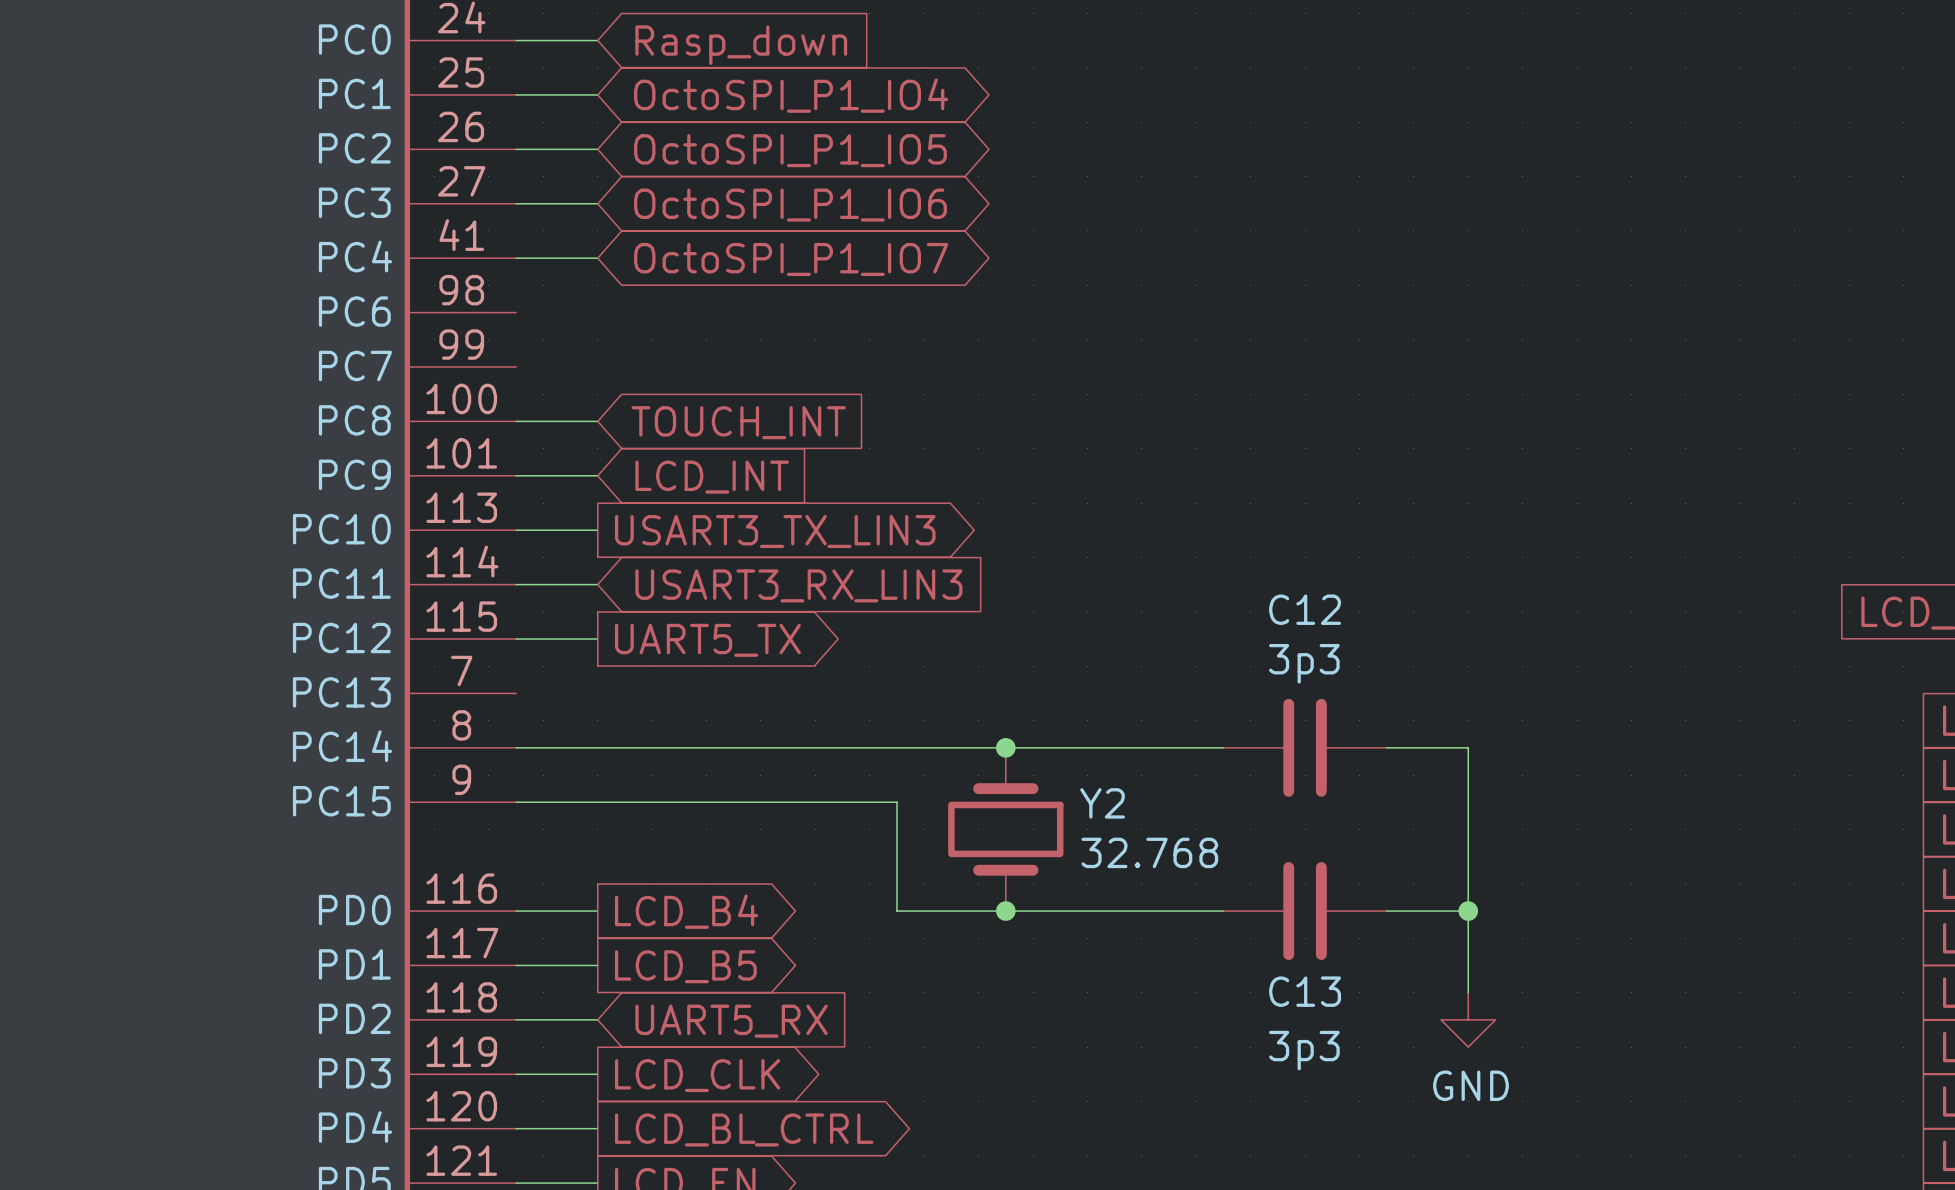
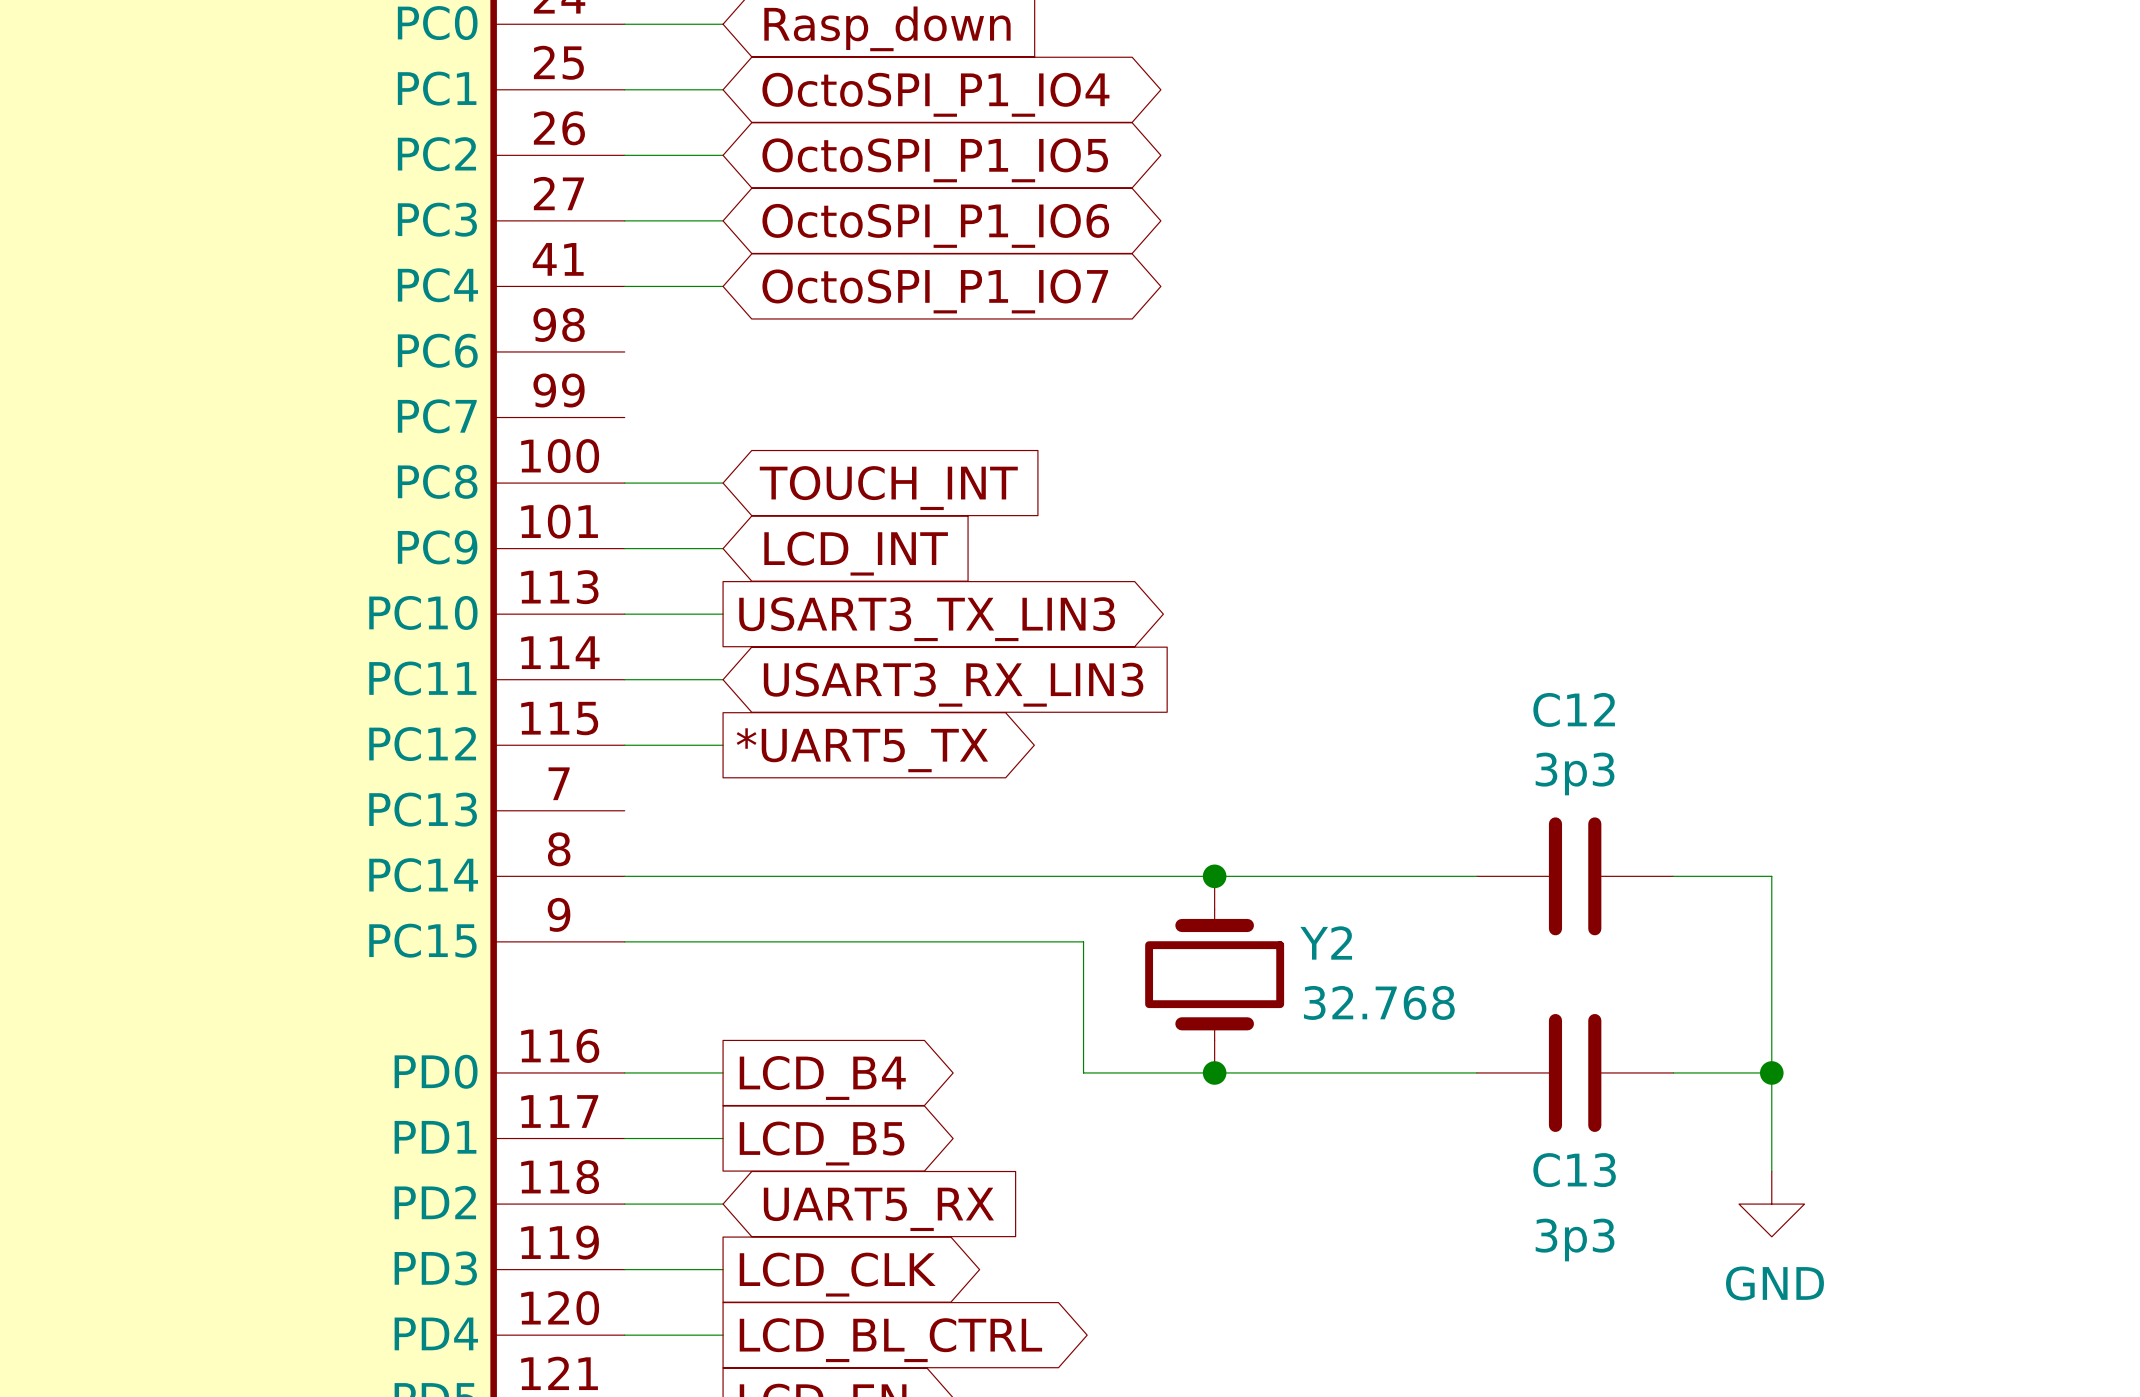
global label: UART5_TX (707, 640) -> *UART5_TX (862, 750)

